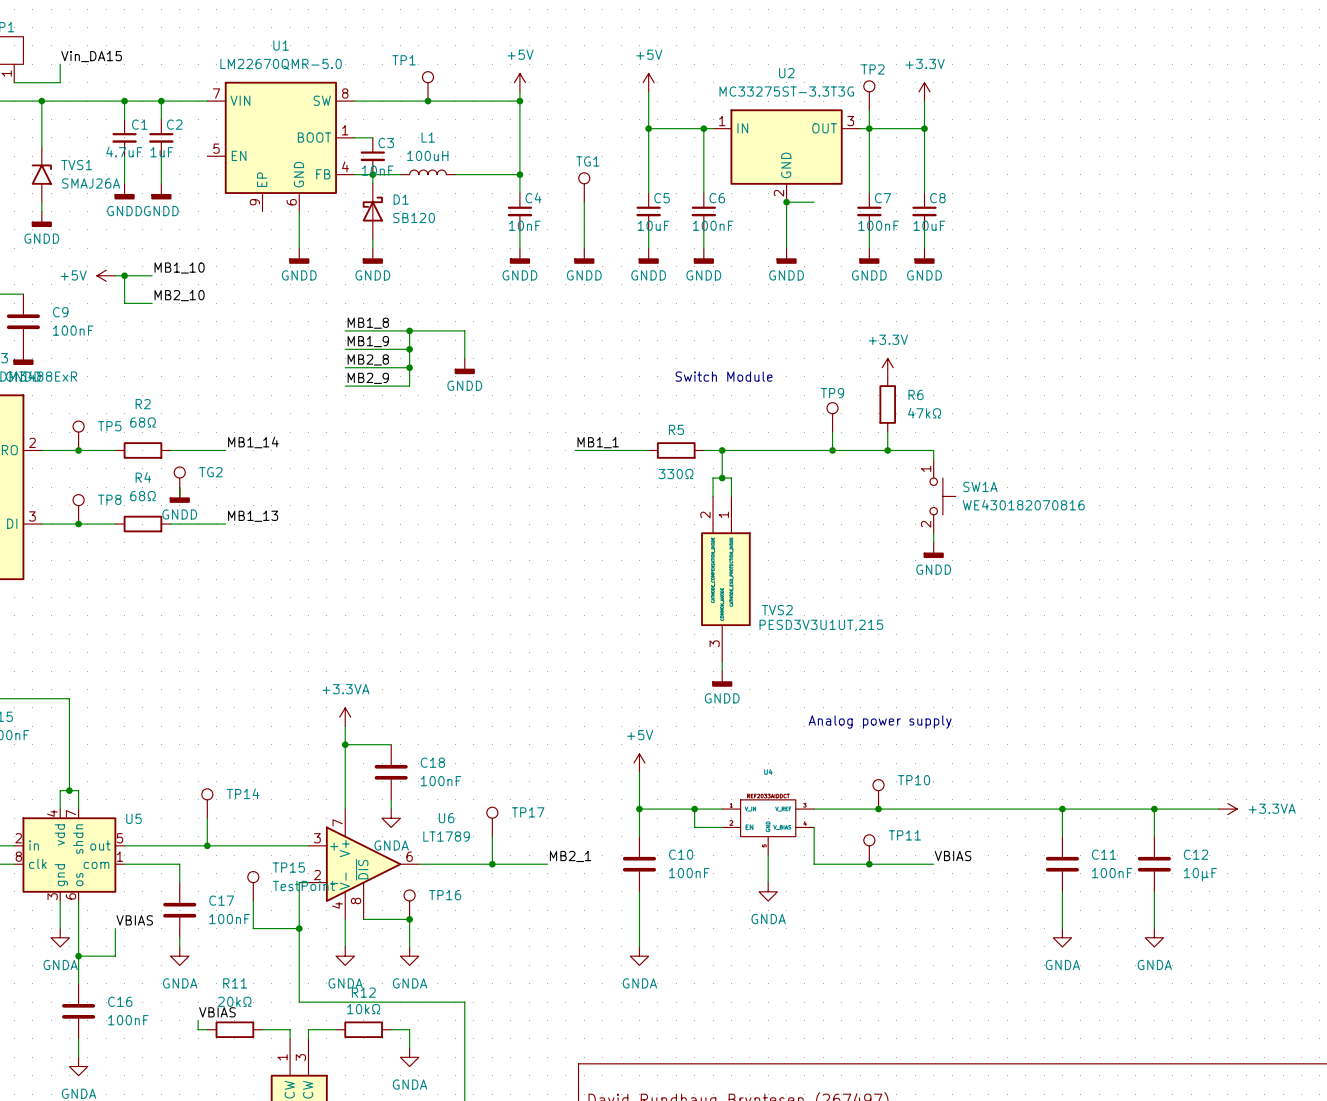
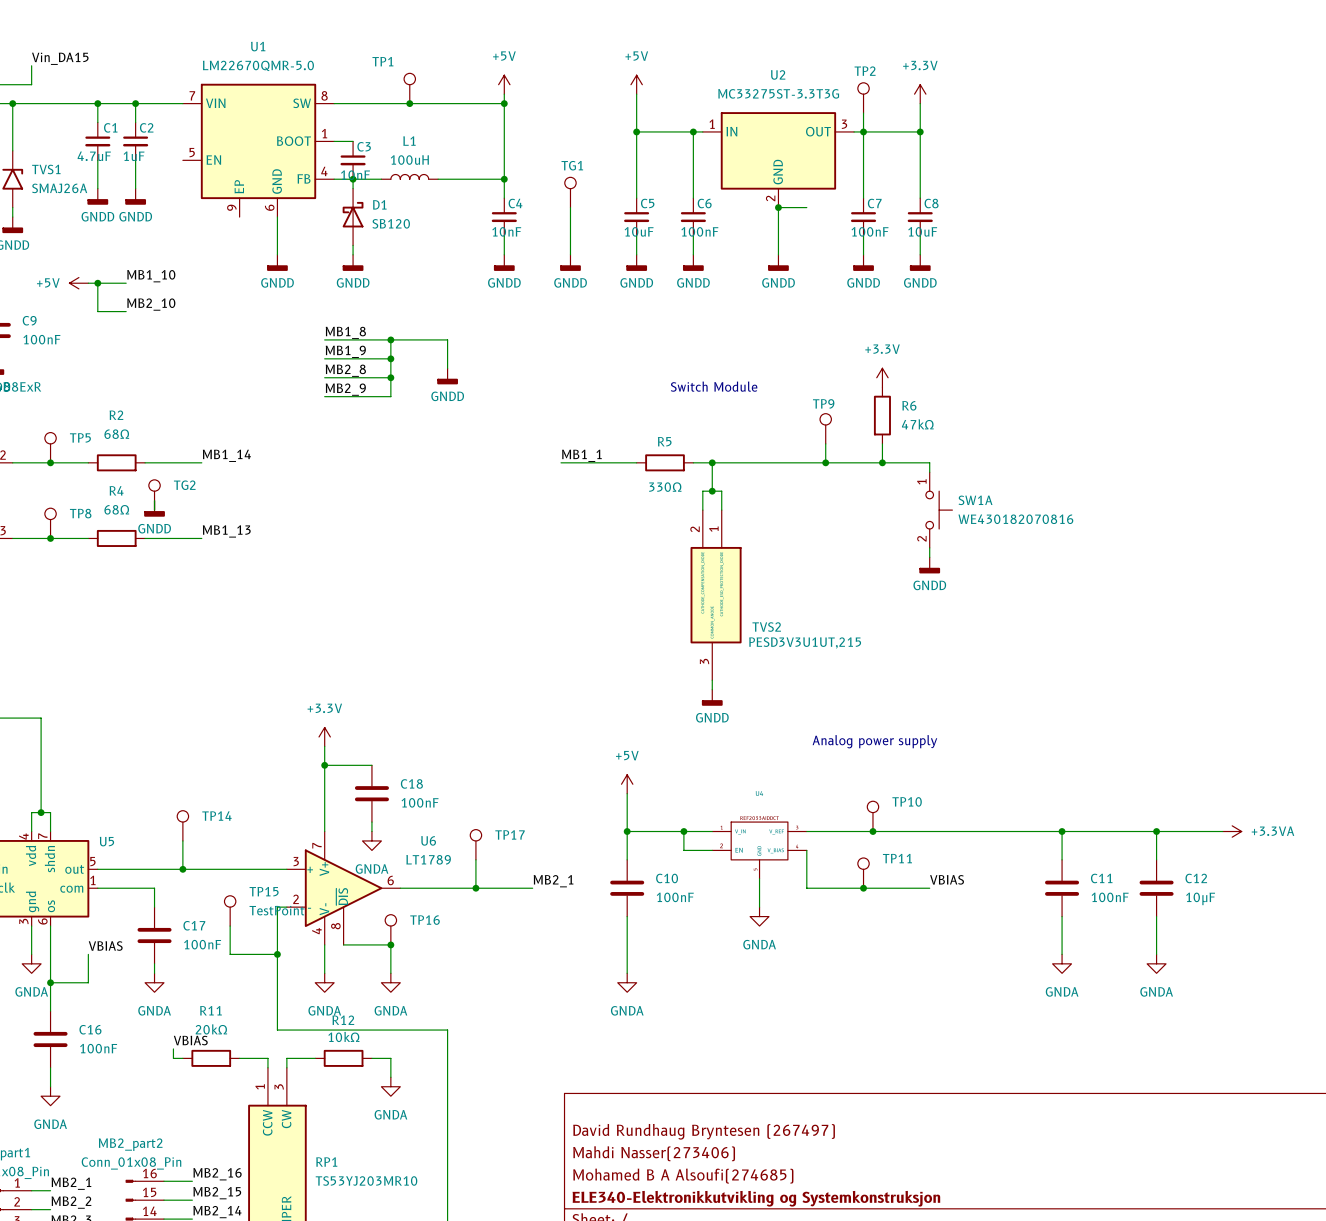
power symbol: +3.3VA (345, 717) -> +3.3V (324, 736)

